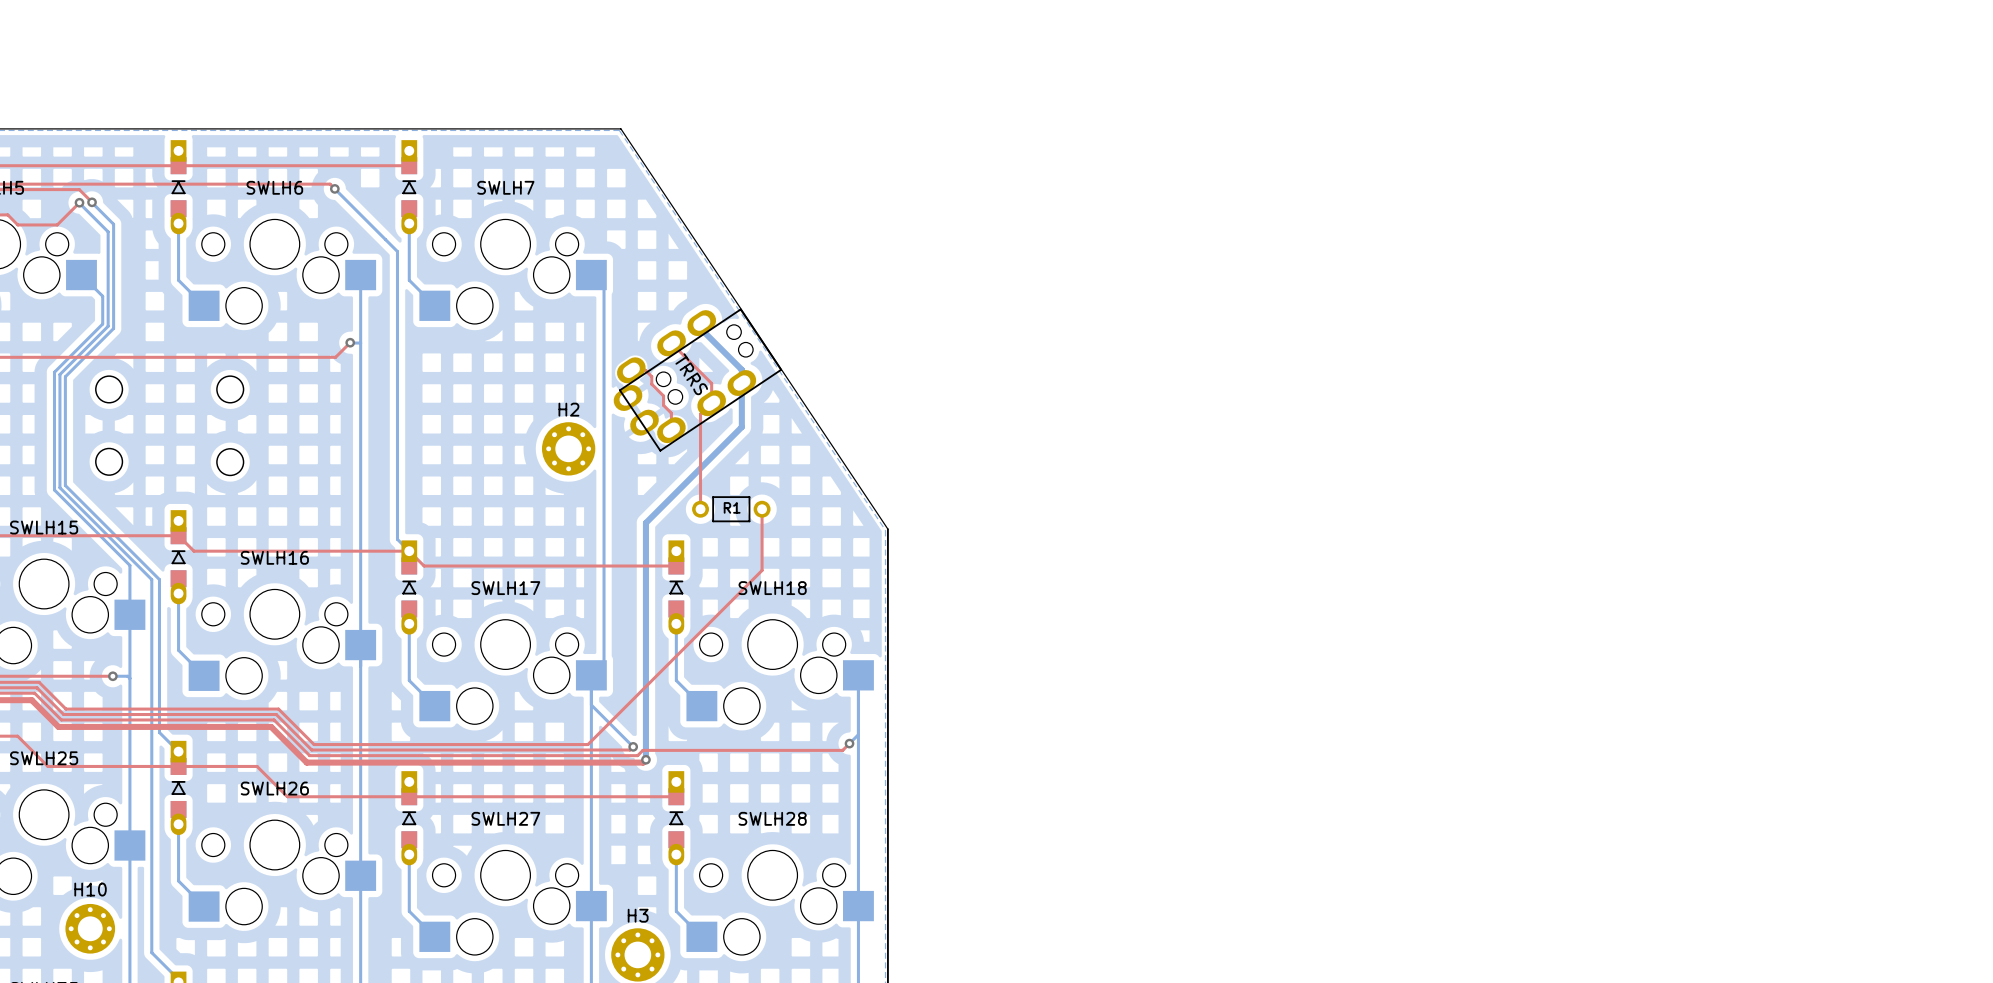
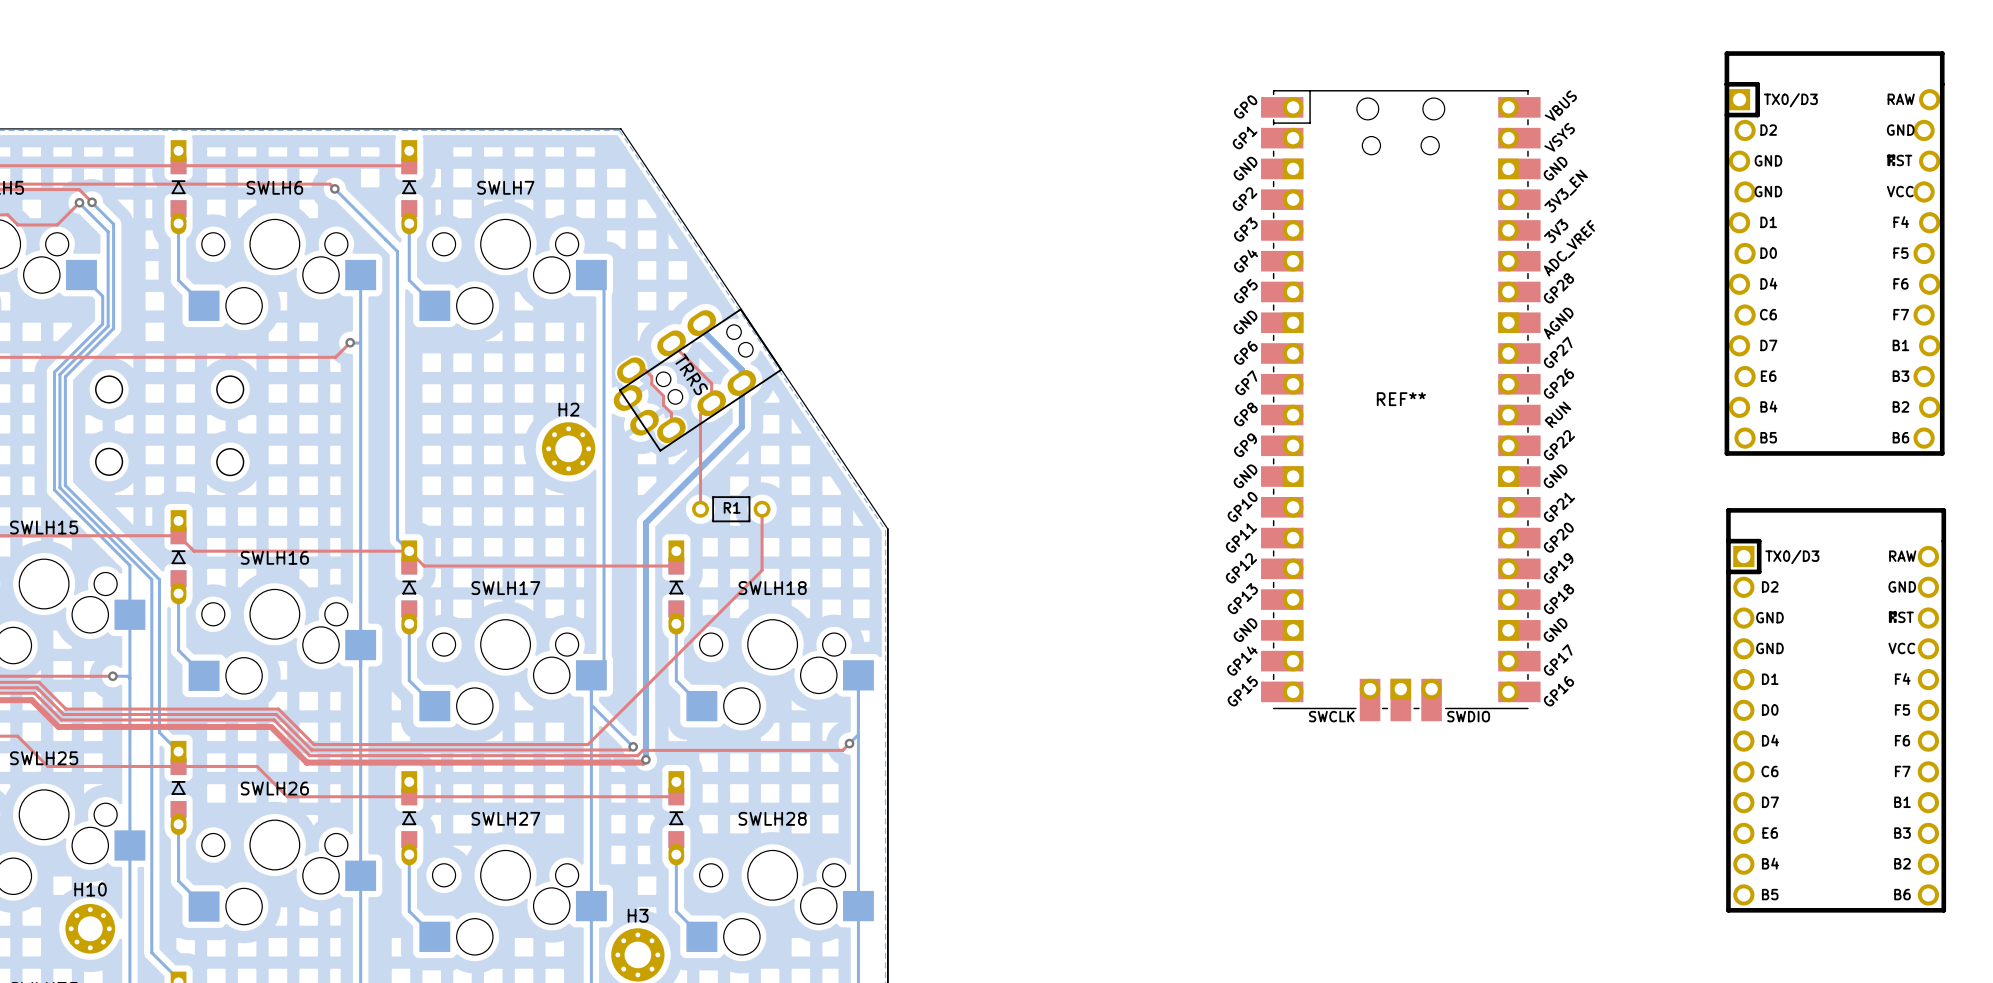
part: none -> (1834, 253)
REF**: none -> (1400, 405)
part: none -> (1836, 710)

